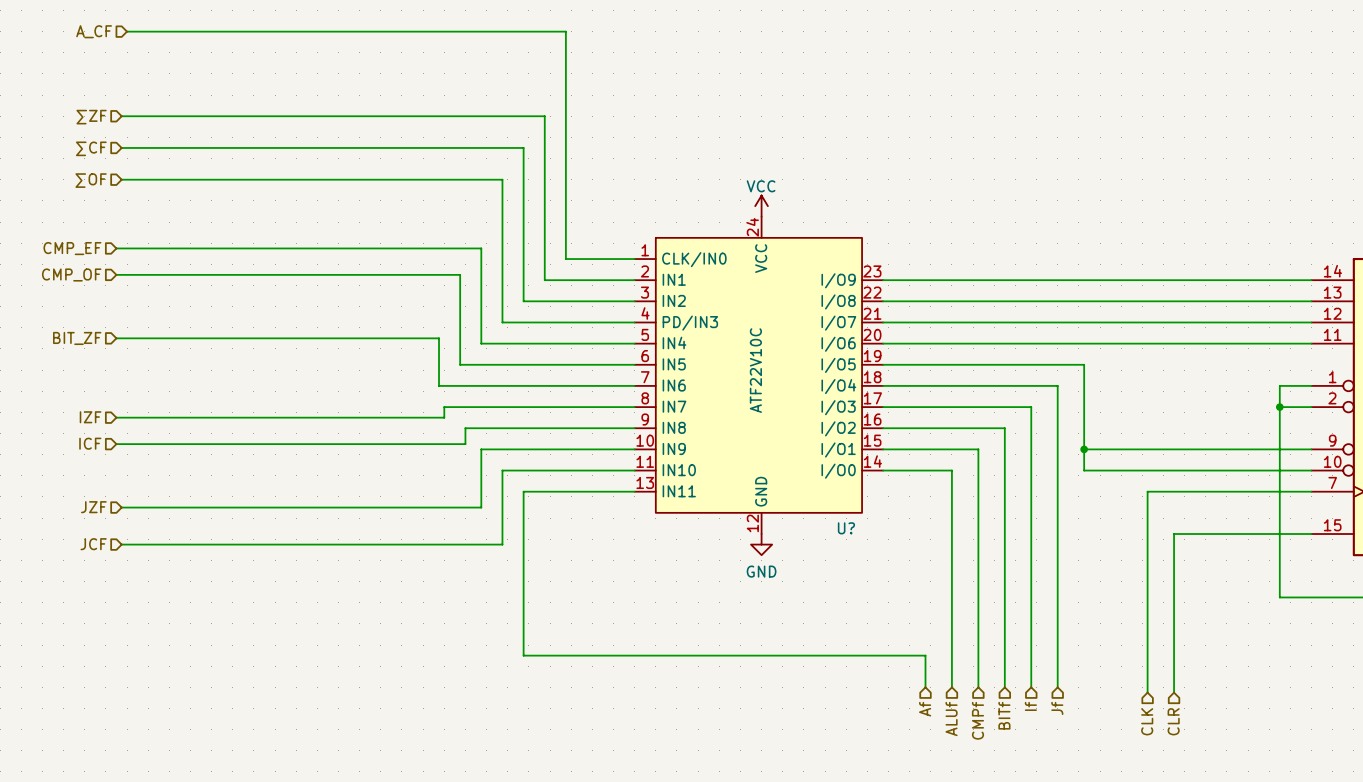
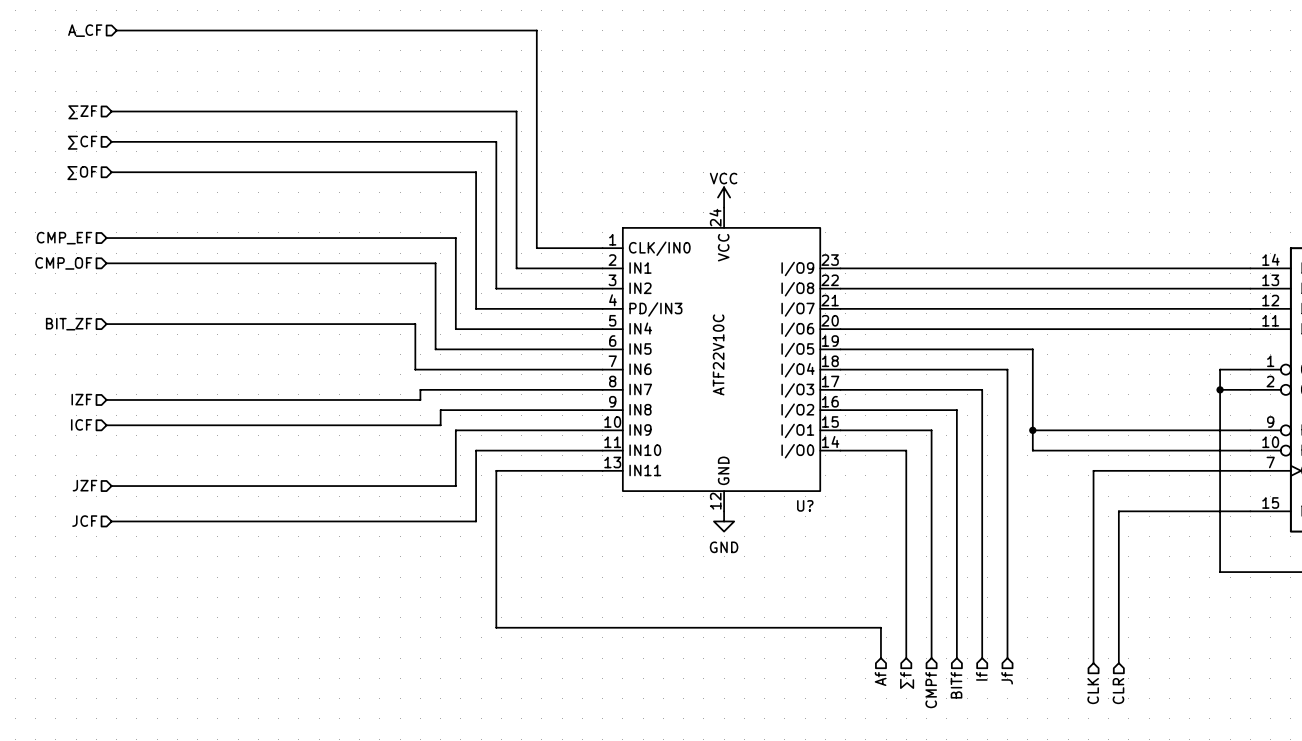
hierarchical label: ALUf (951, 719) -> ∑f (907, 680)

